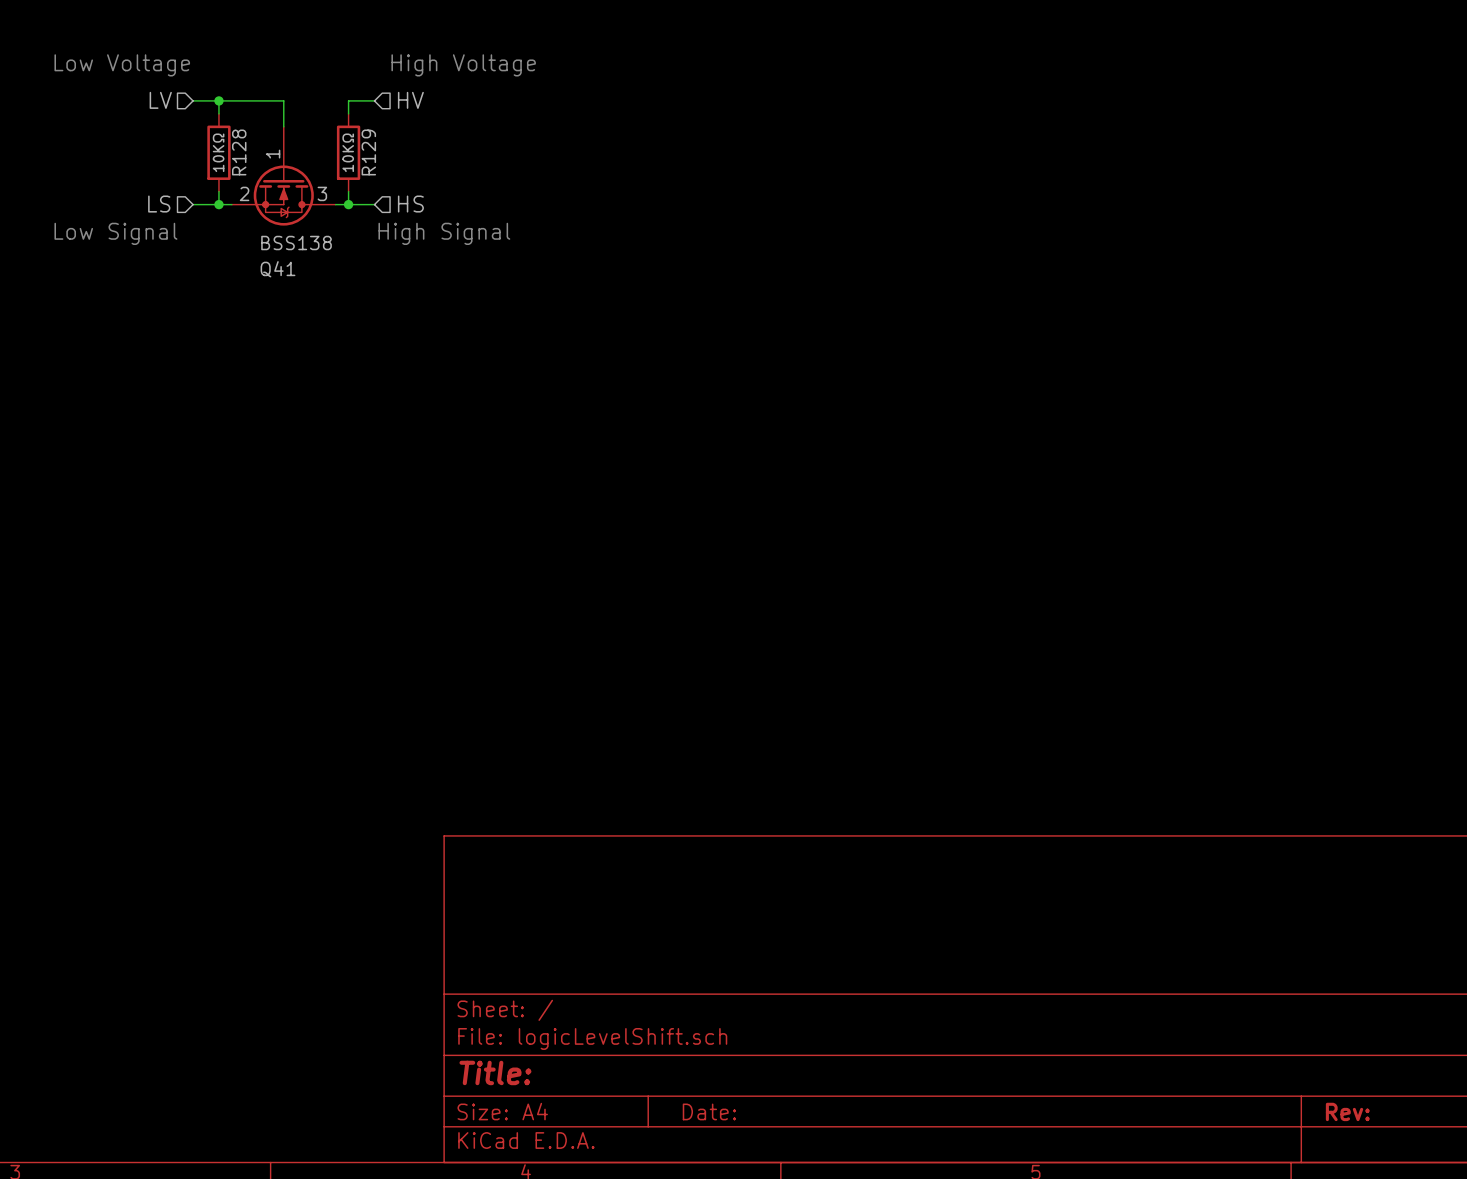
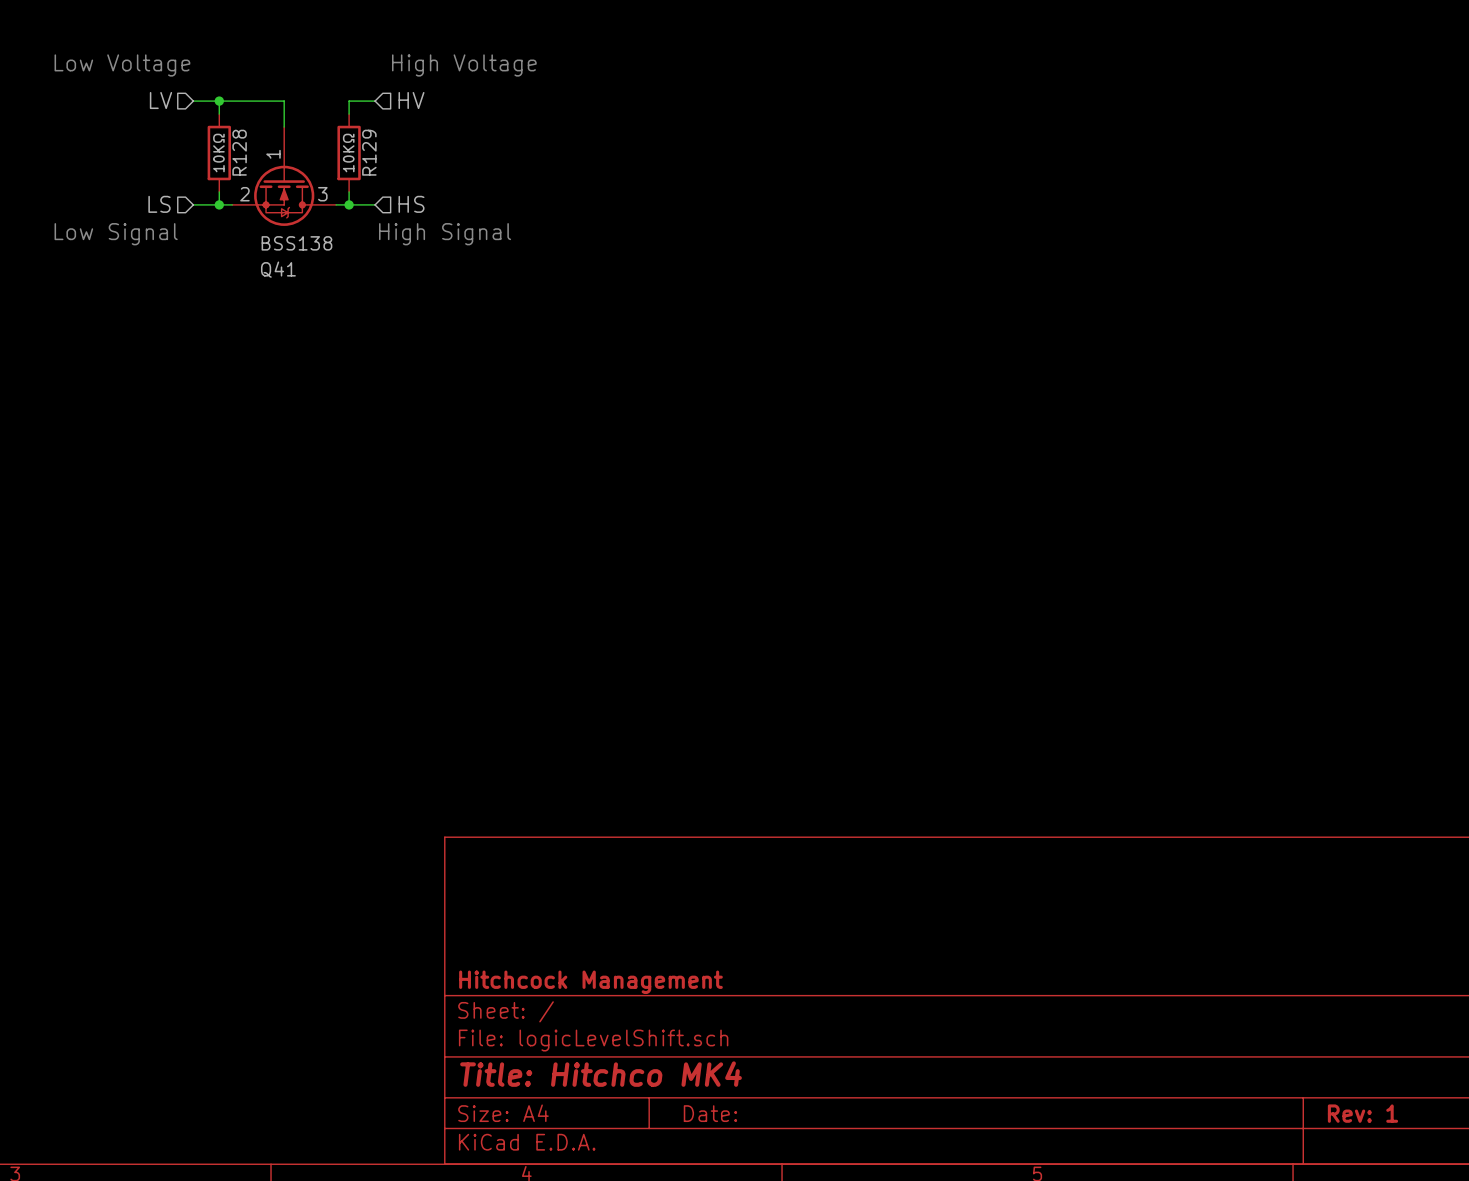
title block: none -> Hitchcock Management (590, 982)
title block: Title: (495, 1072) -> Title: Hitchco MK4 (601, 1074)
title block: Rev: (1347, 1111) -> Rev: 1 (1362, 1113)

